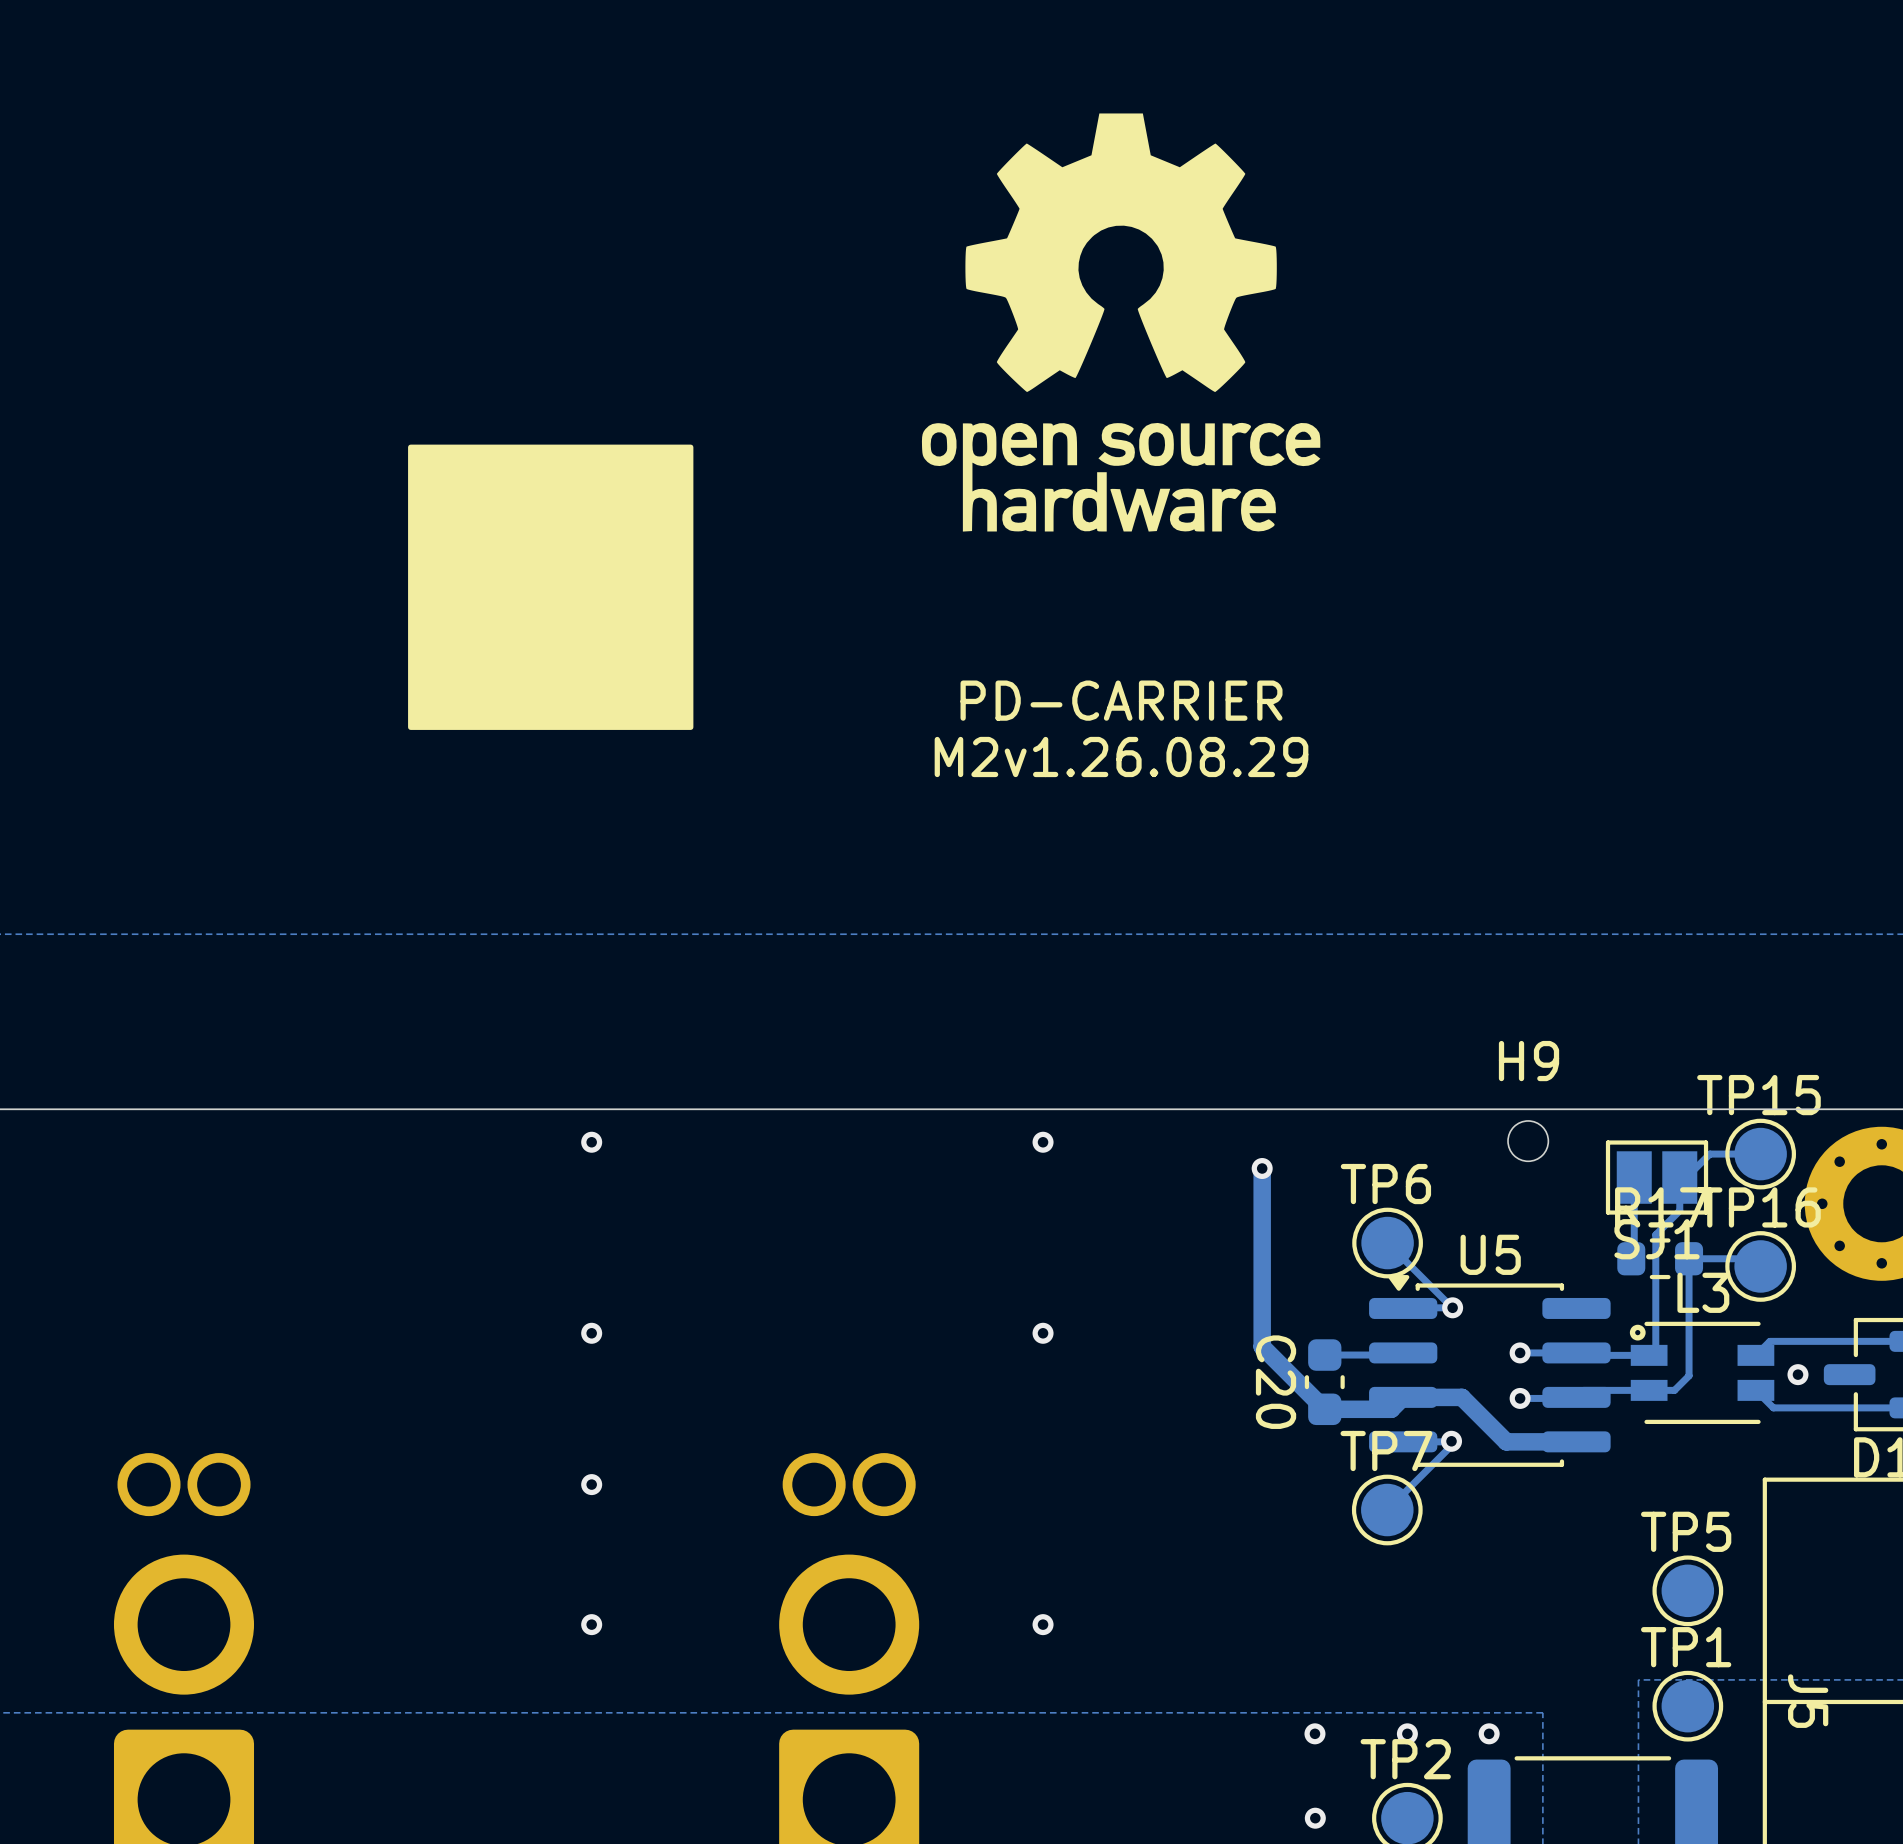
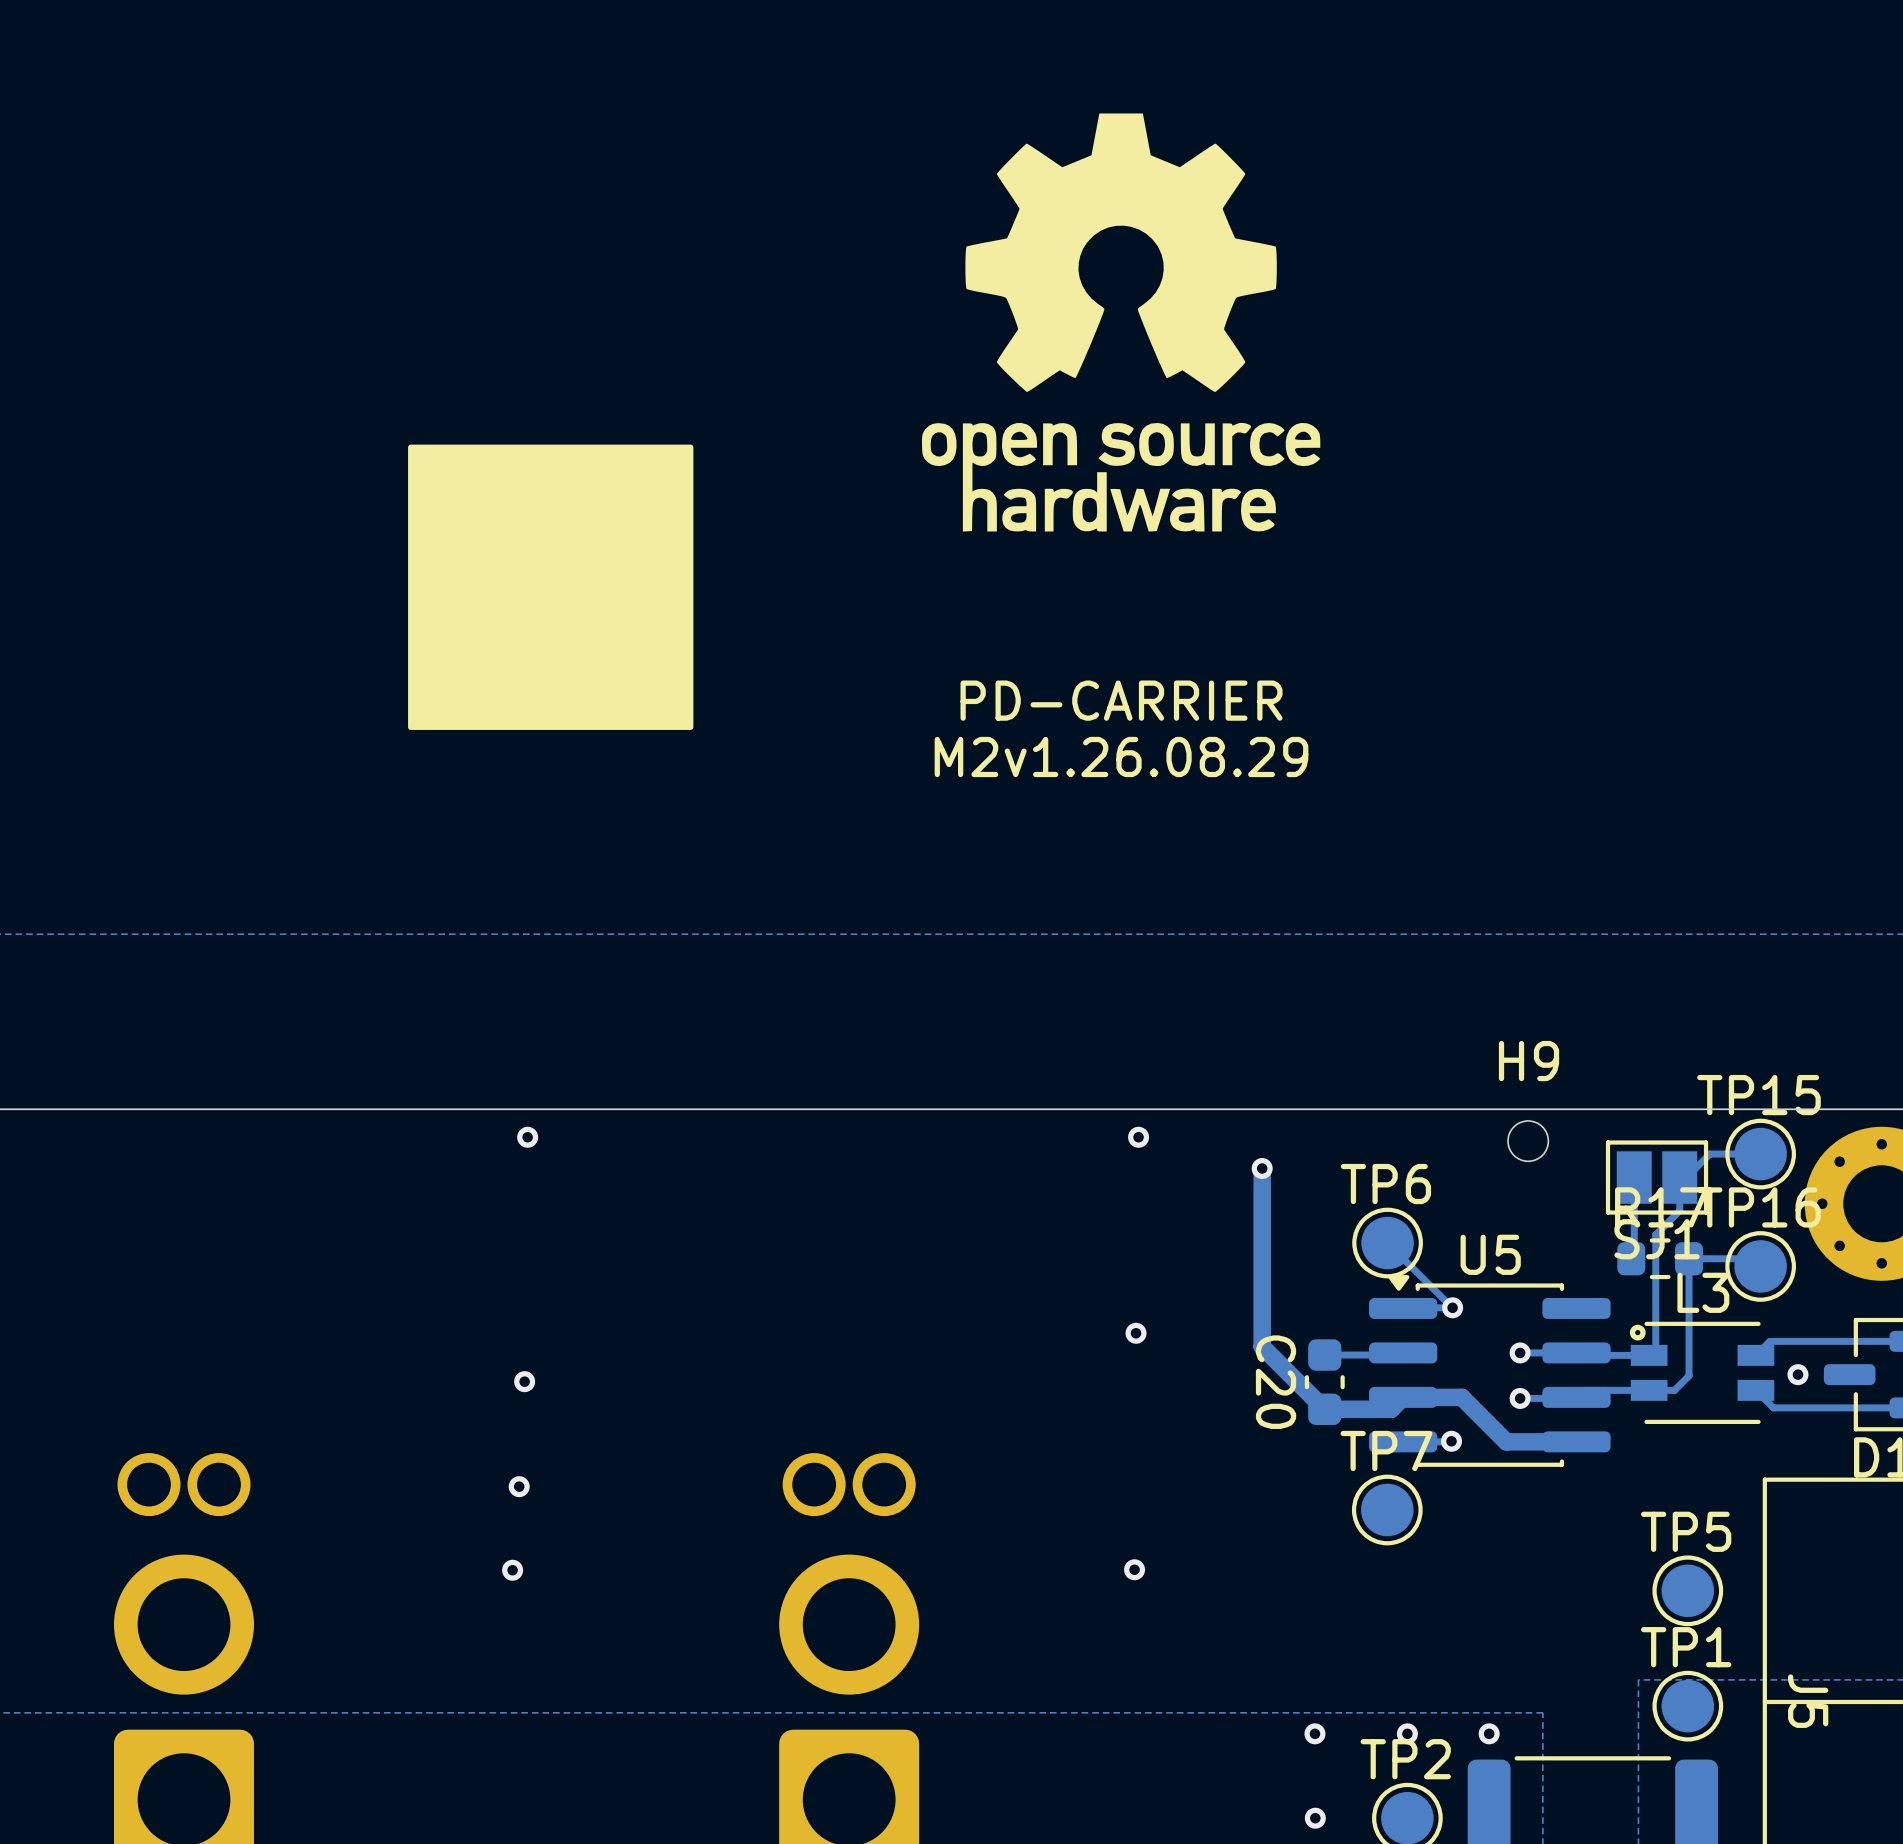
via position: (591, 1142) -> (527, 1137)
via position: (1043, 1142) -> (1138, 1137)
via: (591, 1333) -> none
via position: (1043, 1333) -> (1136, 1333)
via: none -> (524, 1381)
track: (1451, 1441) (1451, 1445) (1387, 1510) -> none
via: (591, 1484) -> none
via: none -> (519, 1486)
via: none -> (512, 1570)
via: (591, 1624) -> none
via position: (1043, 1624) -> (1134, 1569)

